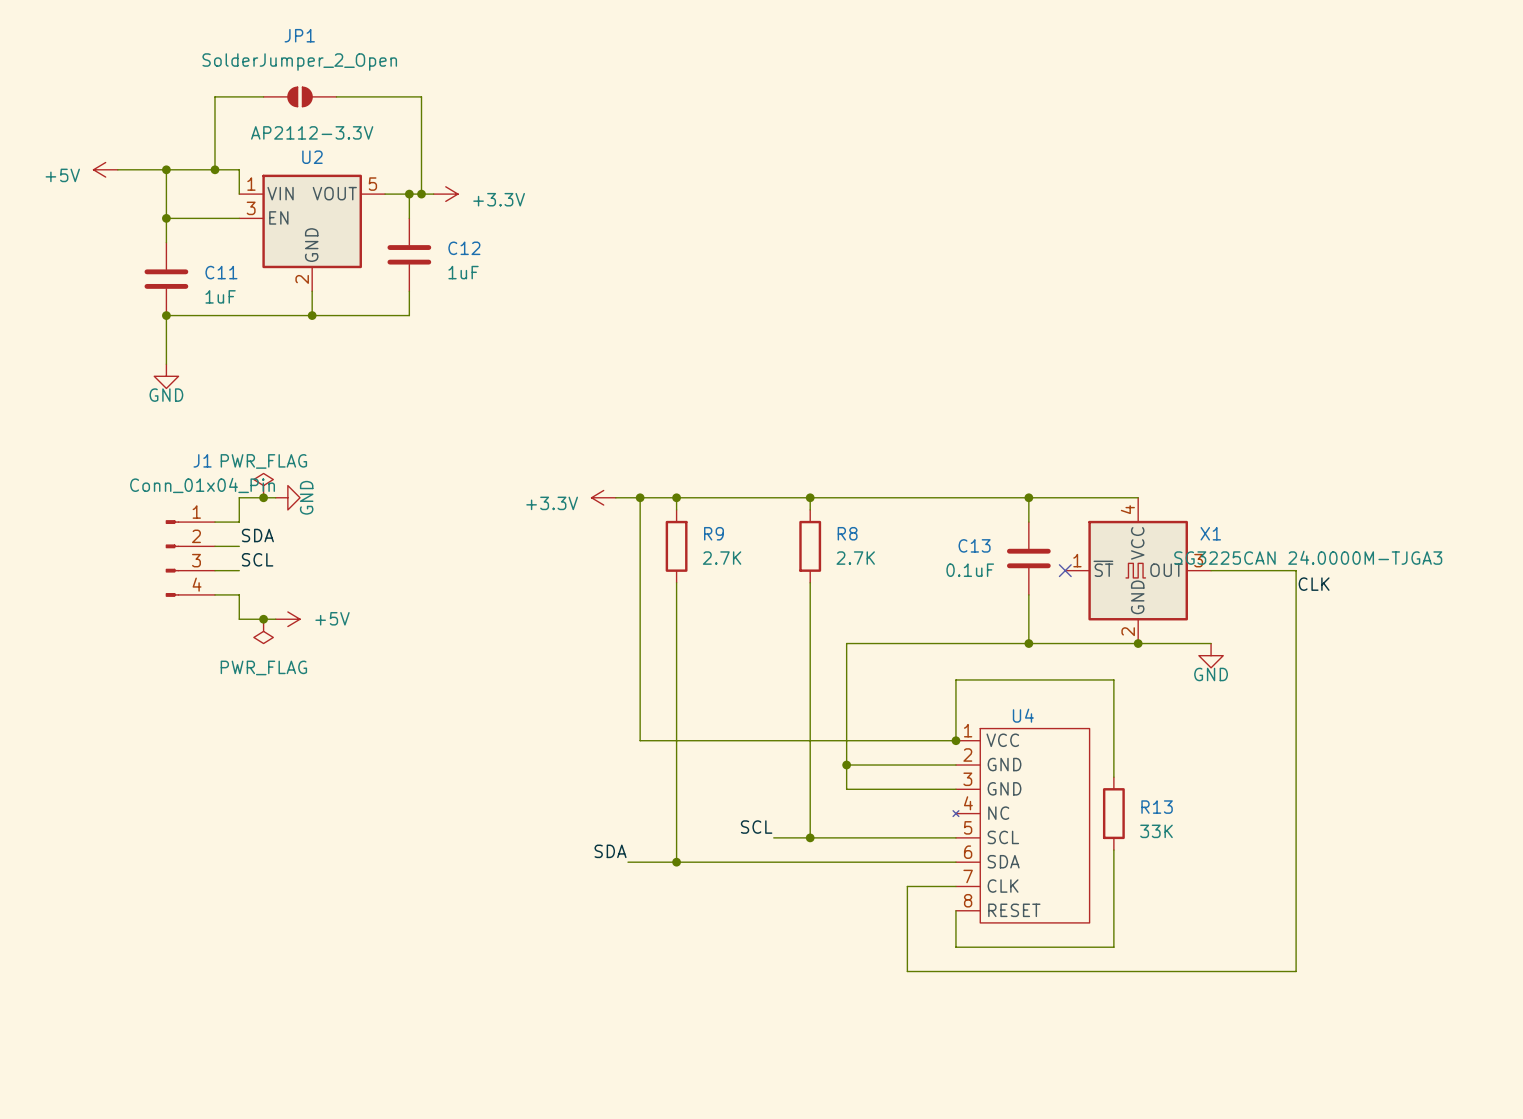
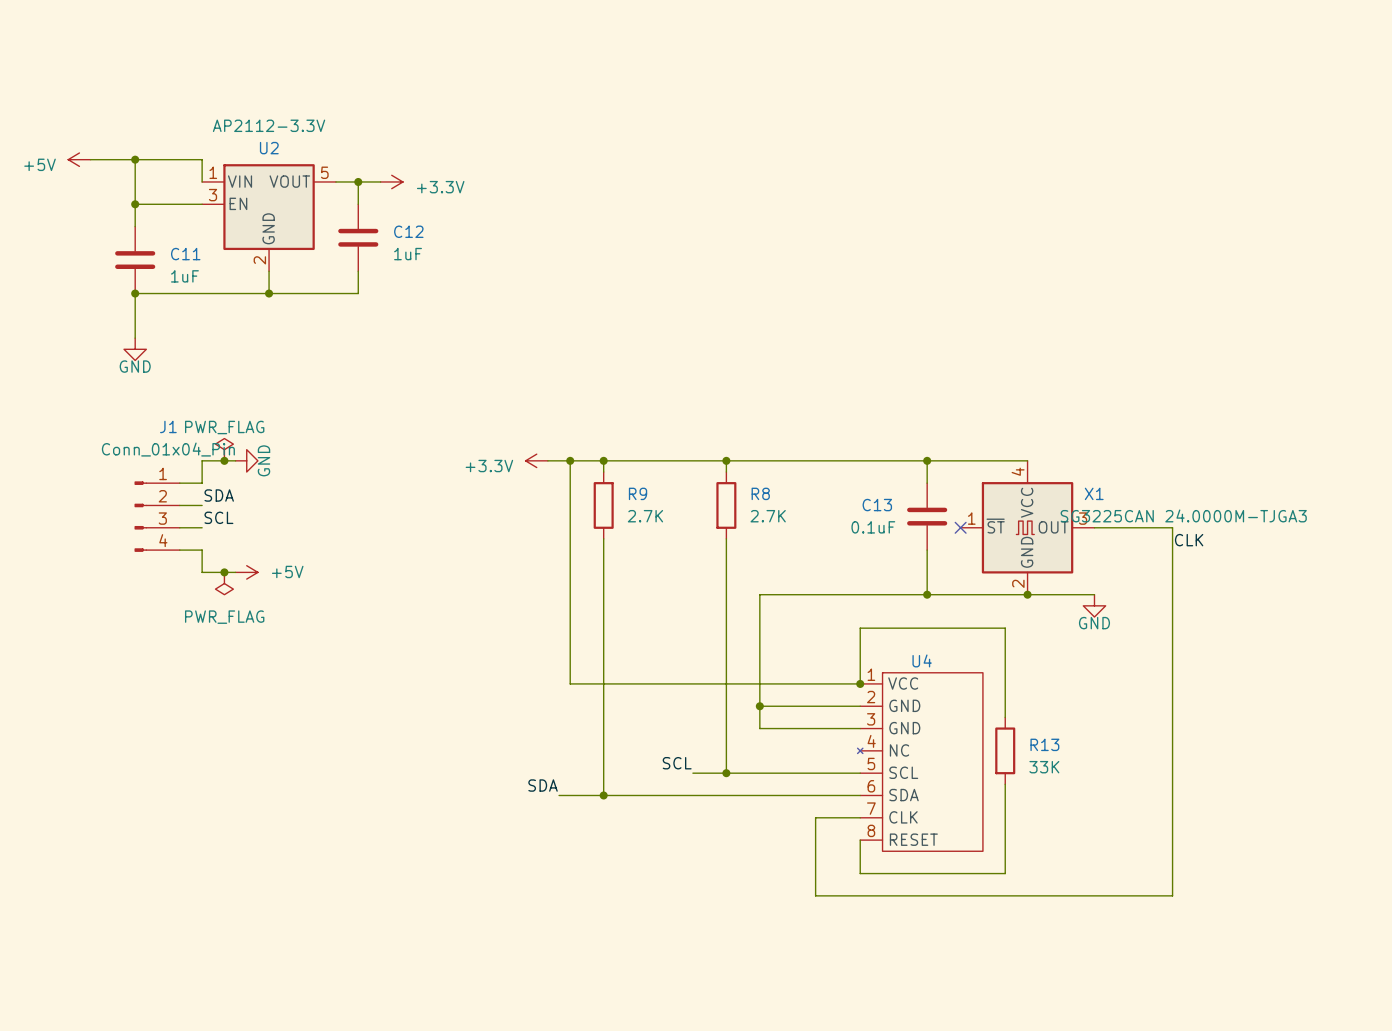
wire: (263, 96) (214, 96) (214, 169) -> none
JP1: SolderJumper_2_Open (300, 96) -> none
wire: (336, 96) (421, 96) (421, 194) -> none
junction: (214, 169) -> none
junction: (421, 194) -> none

